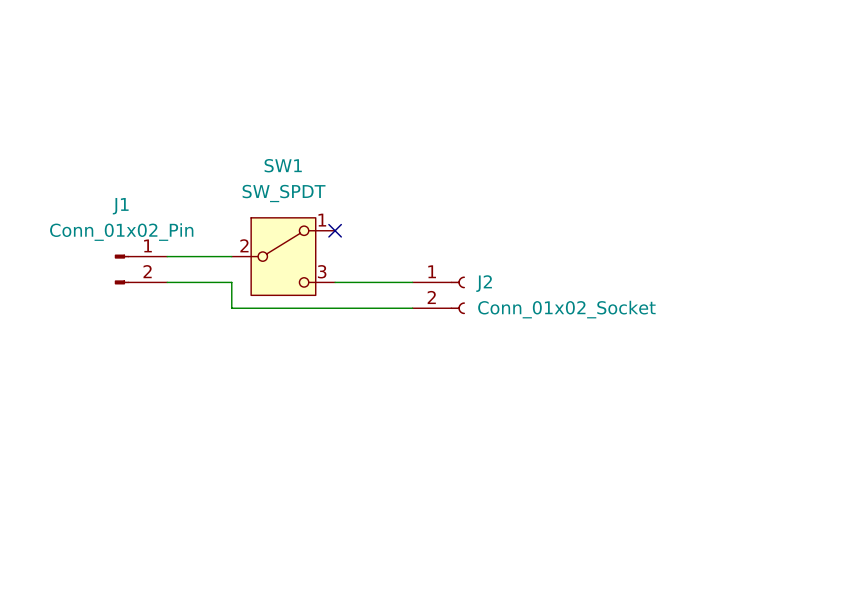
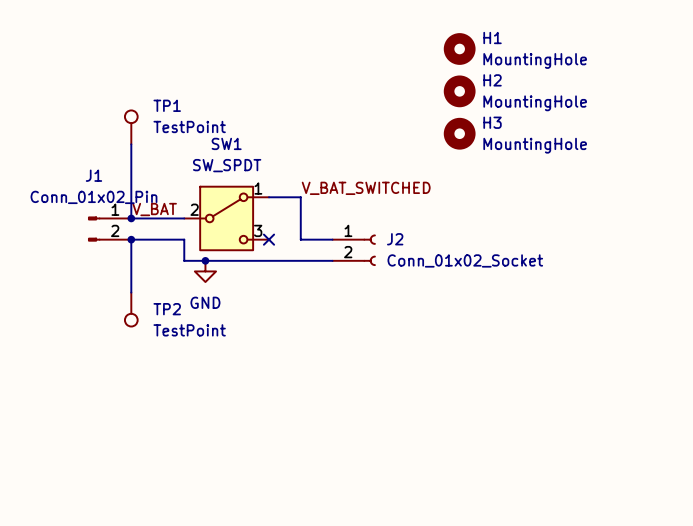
H1: none -> MountingHole (459, 48)
H2: none -> MountingHole (459, 91)
TP1: none -> TestPoint (131, 127)
H3: none -> MountingHole (459, 133)
wire: none -> (131, 144) (131, 218)
label: none -> V_BAT_SWITCHED (366, 188)
no-connect mark position: (335, 230) -> (269, 239)
label: none -> V_BAT (154, 209)
junction: none -> (131, 218)
wire: none -> (131, 239) (131, 292)
junction: none -> (131, 239)
wire: (335, 282) (373, 282) -> (269, 197) (300, 197) (300, 239)
junction: none -> (205, 260)
power symbol: none -> GND (205, 271)
TP2: none -> TestPoint (131, 309)

